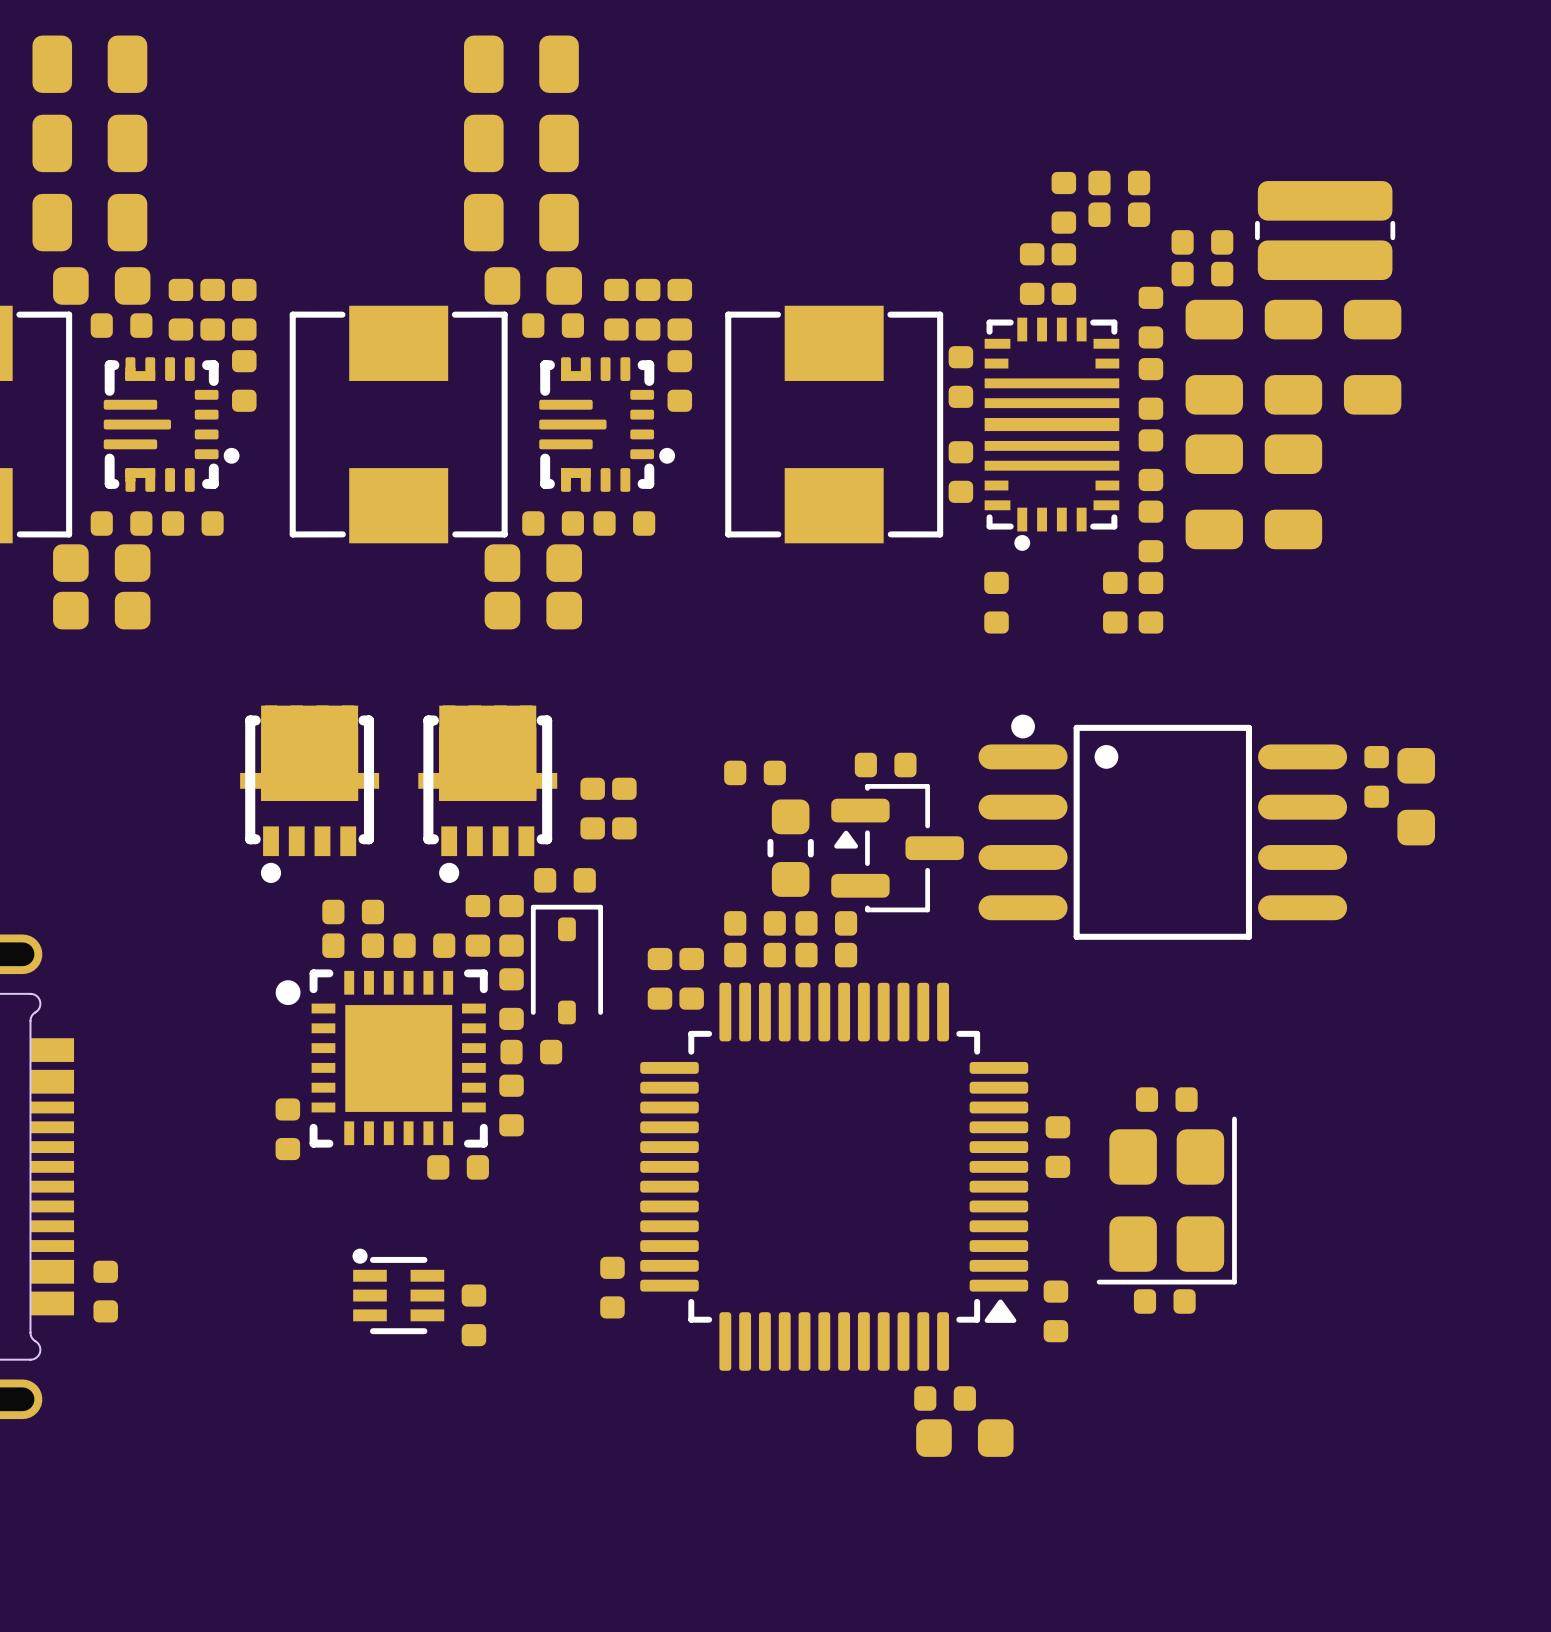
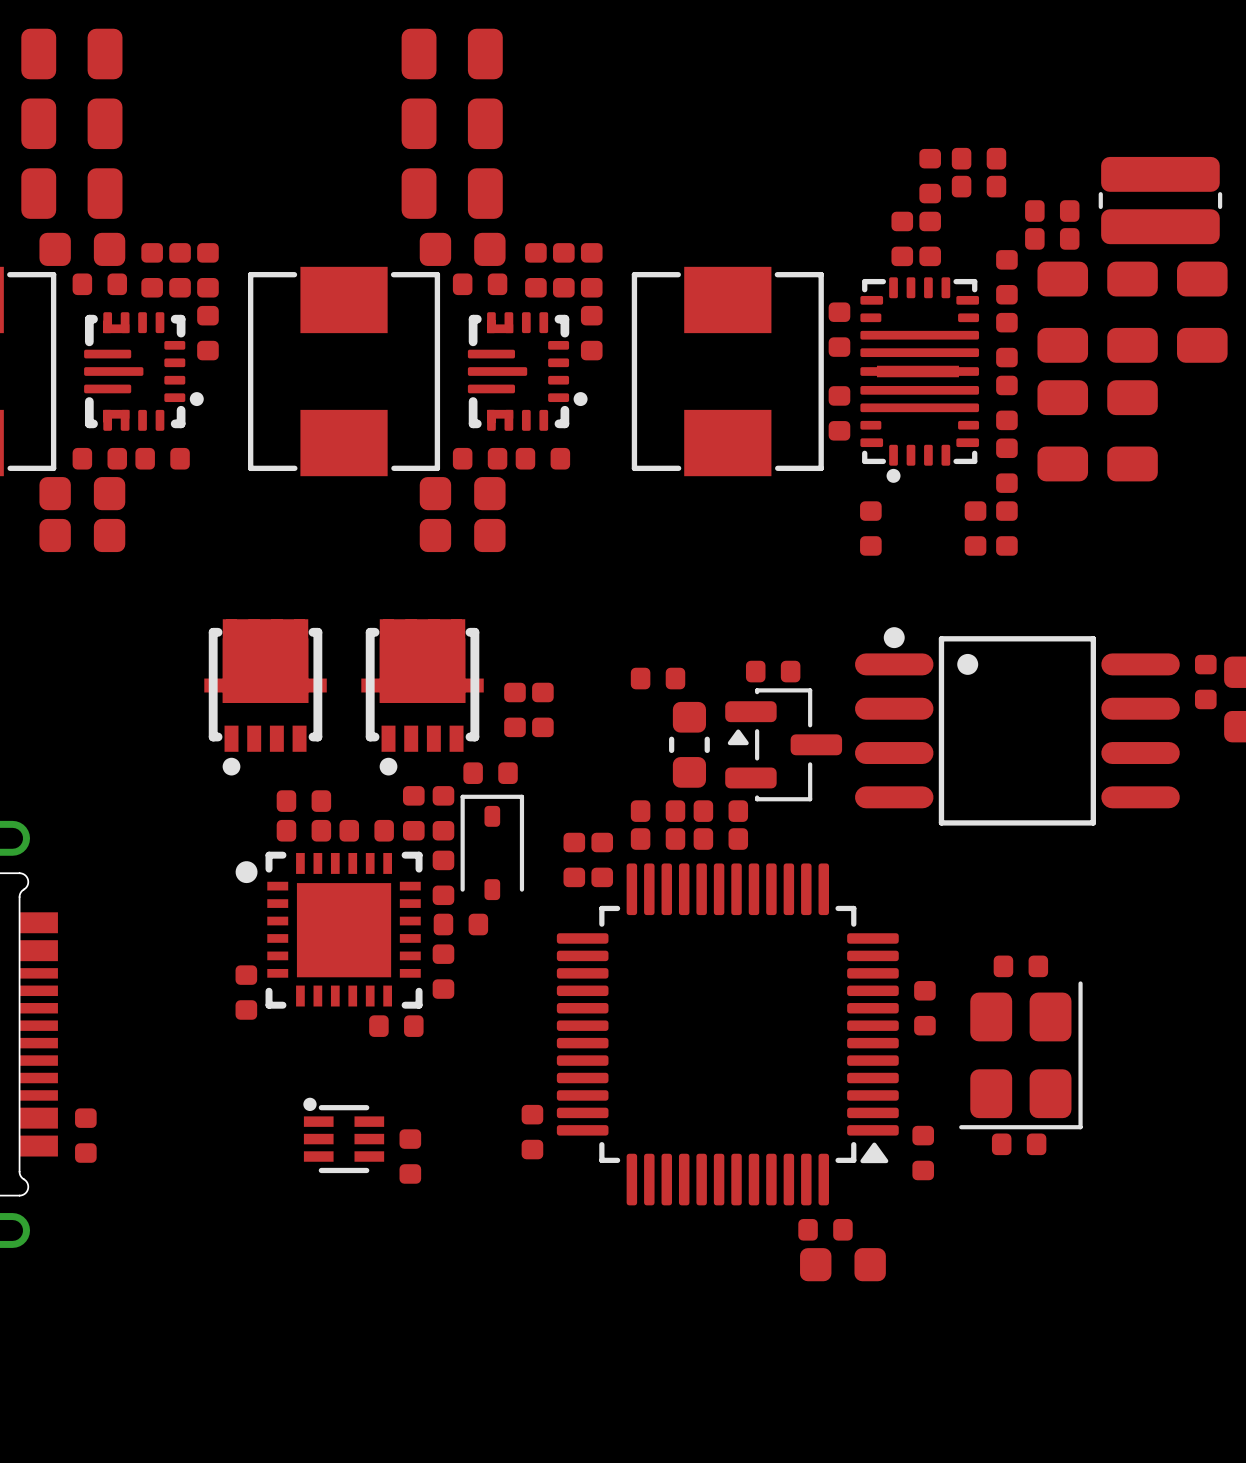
part footprint: [984, 317, 1120, 551] -> [860, 277, 980, 483]

